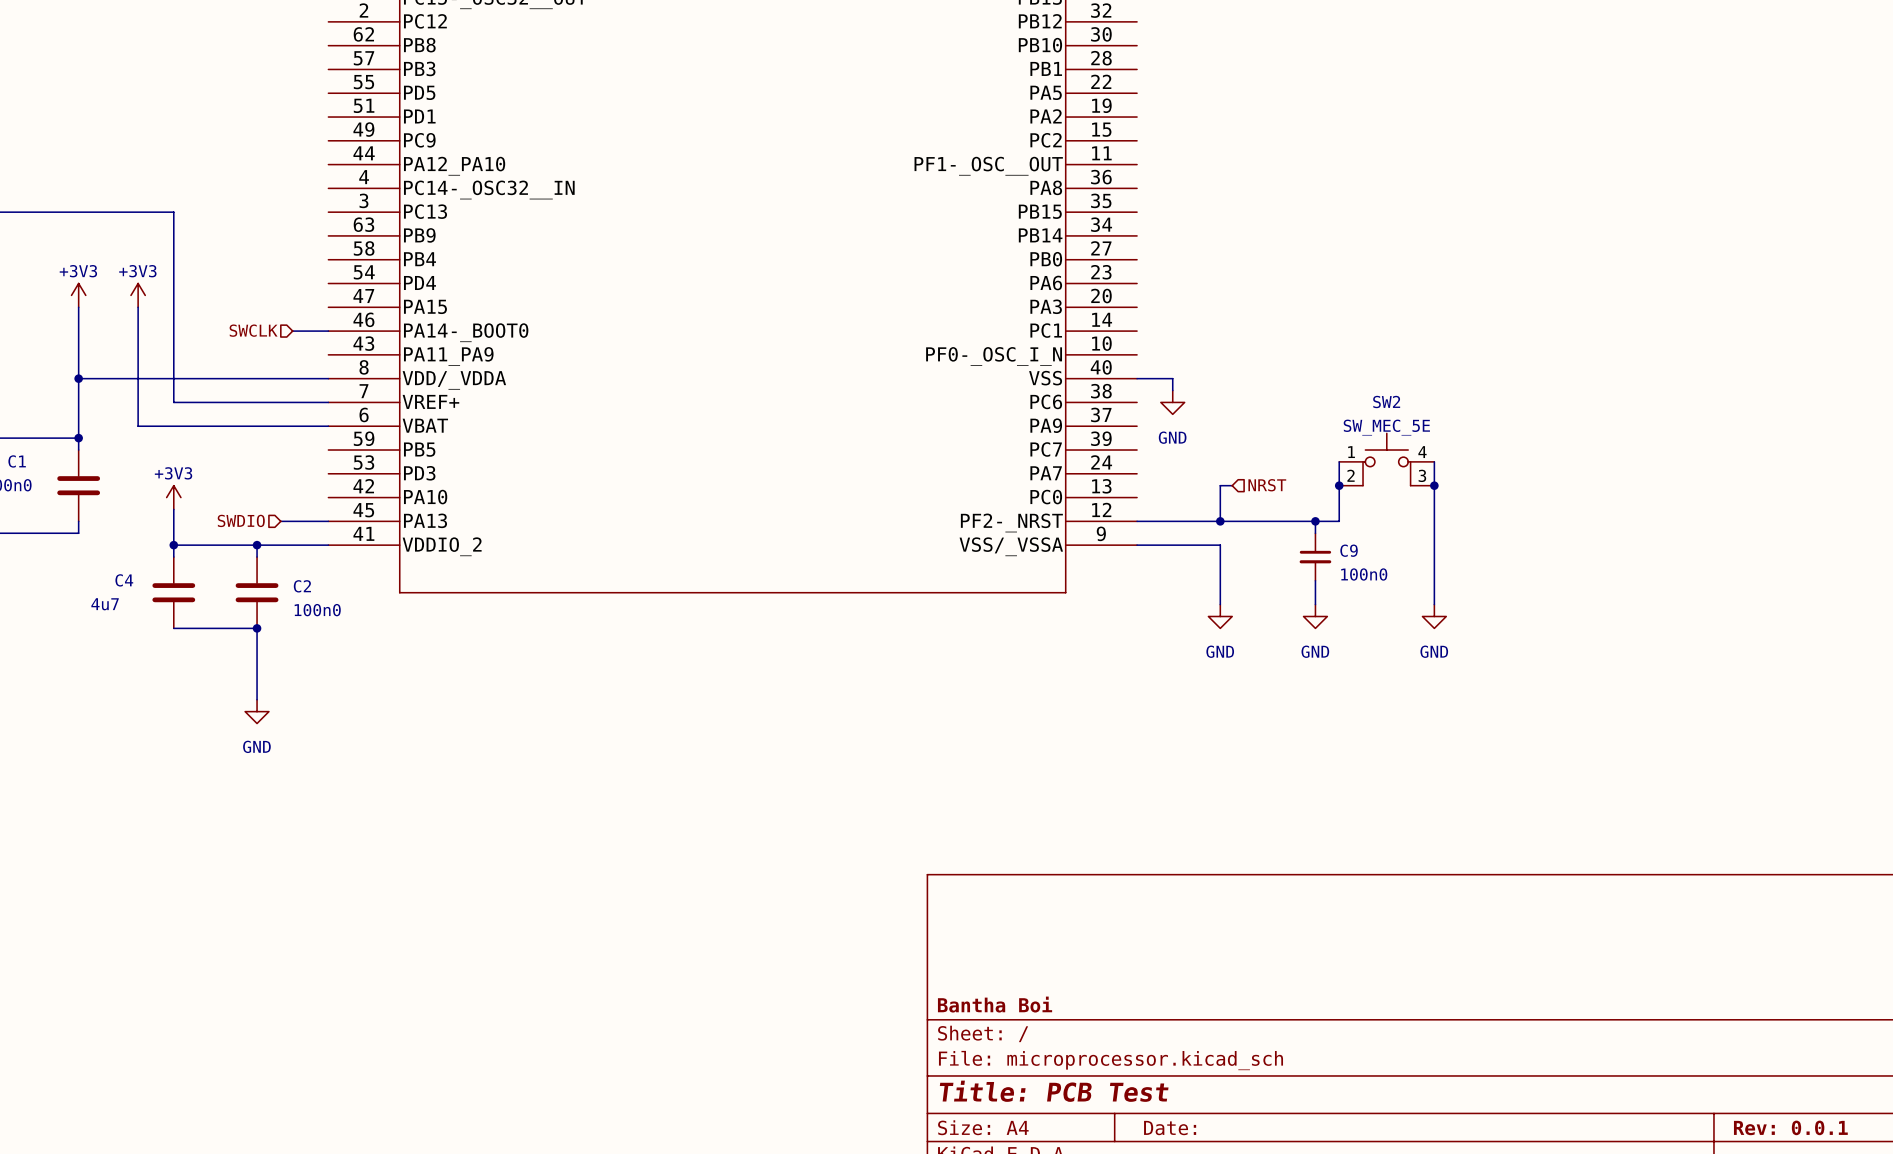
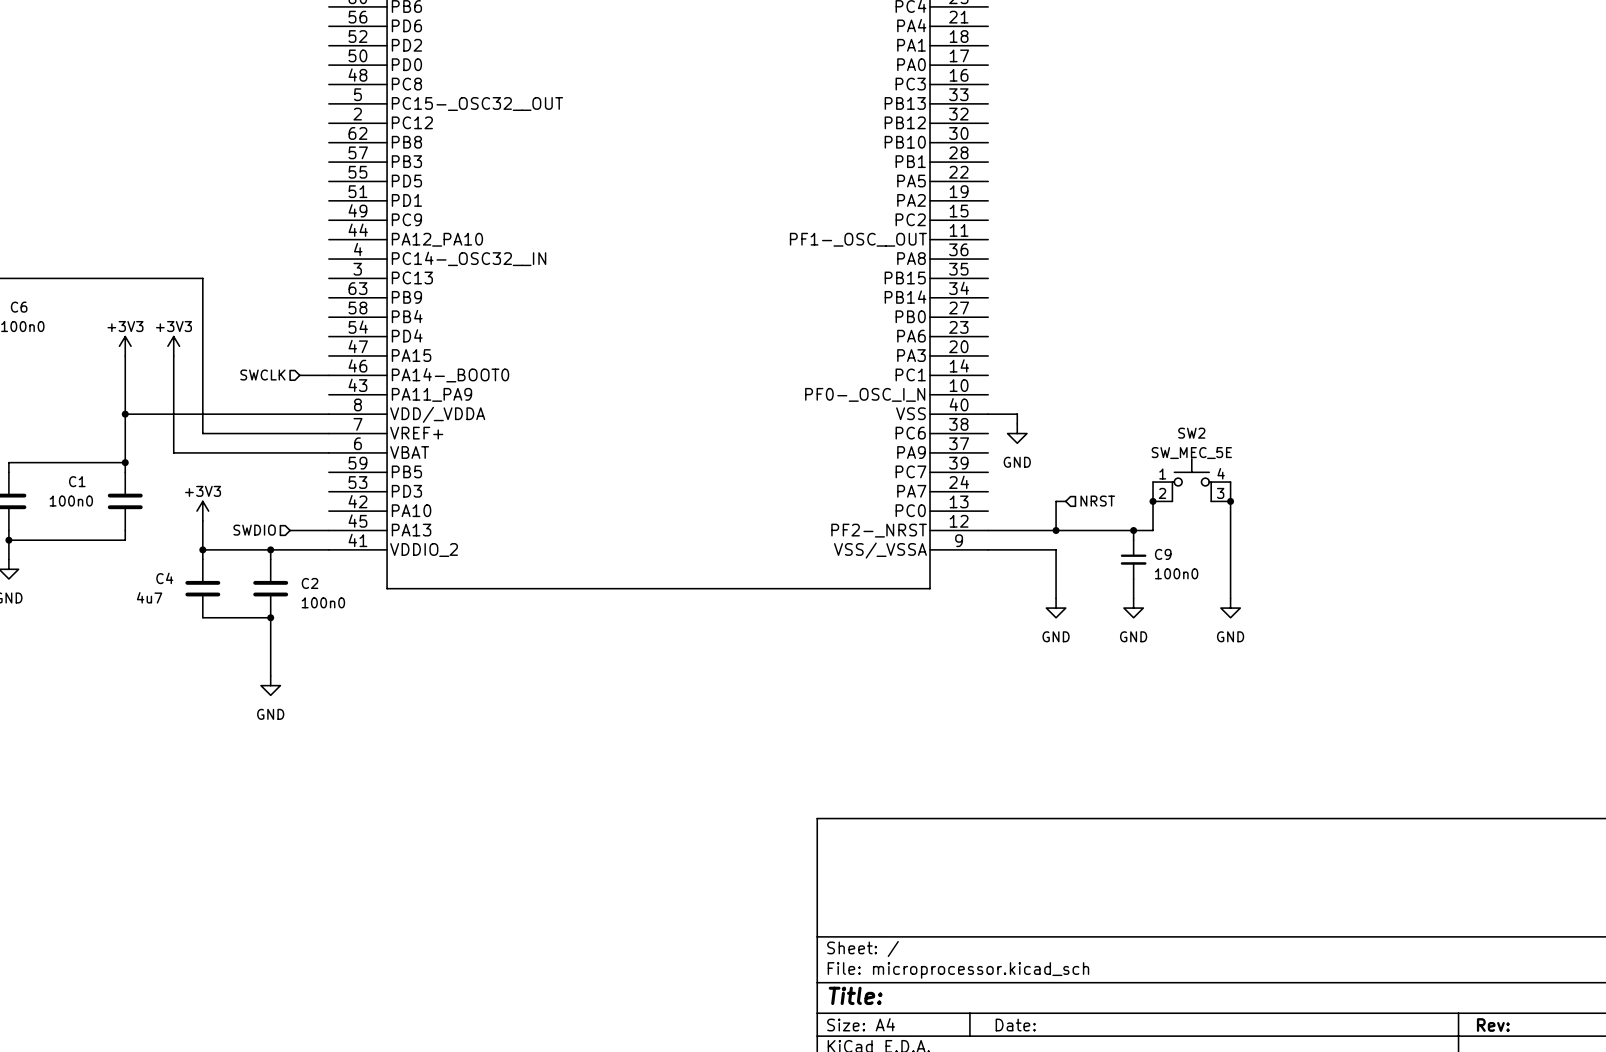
title block: Bantha Boi (995, 1004) -> none
title block: Title: PCB Test (1054, 1091) -> Title: (855, 995)
title block: Rev: 0.0.1 (1790, 1127) -> Rev: (1493, 1025)

